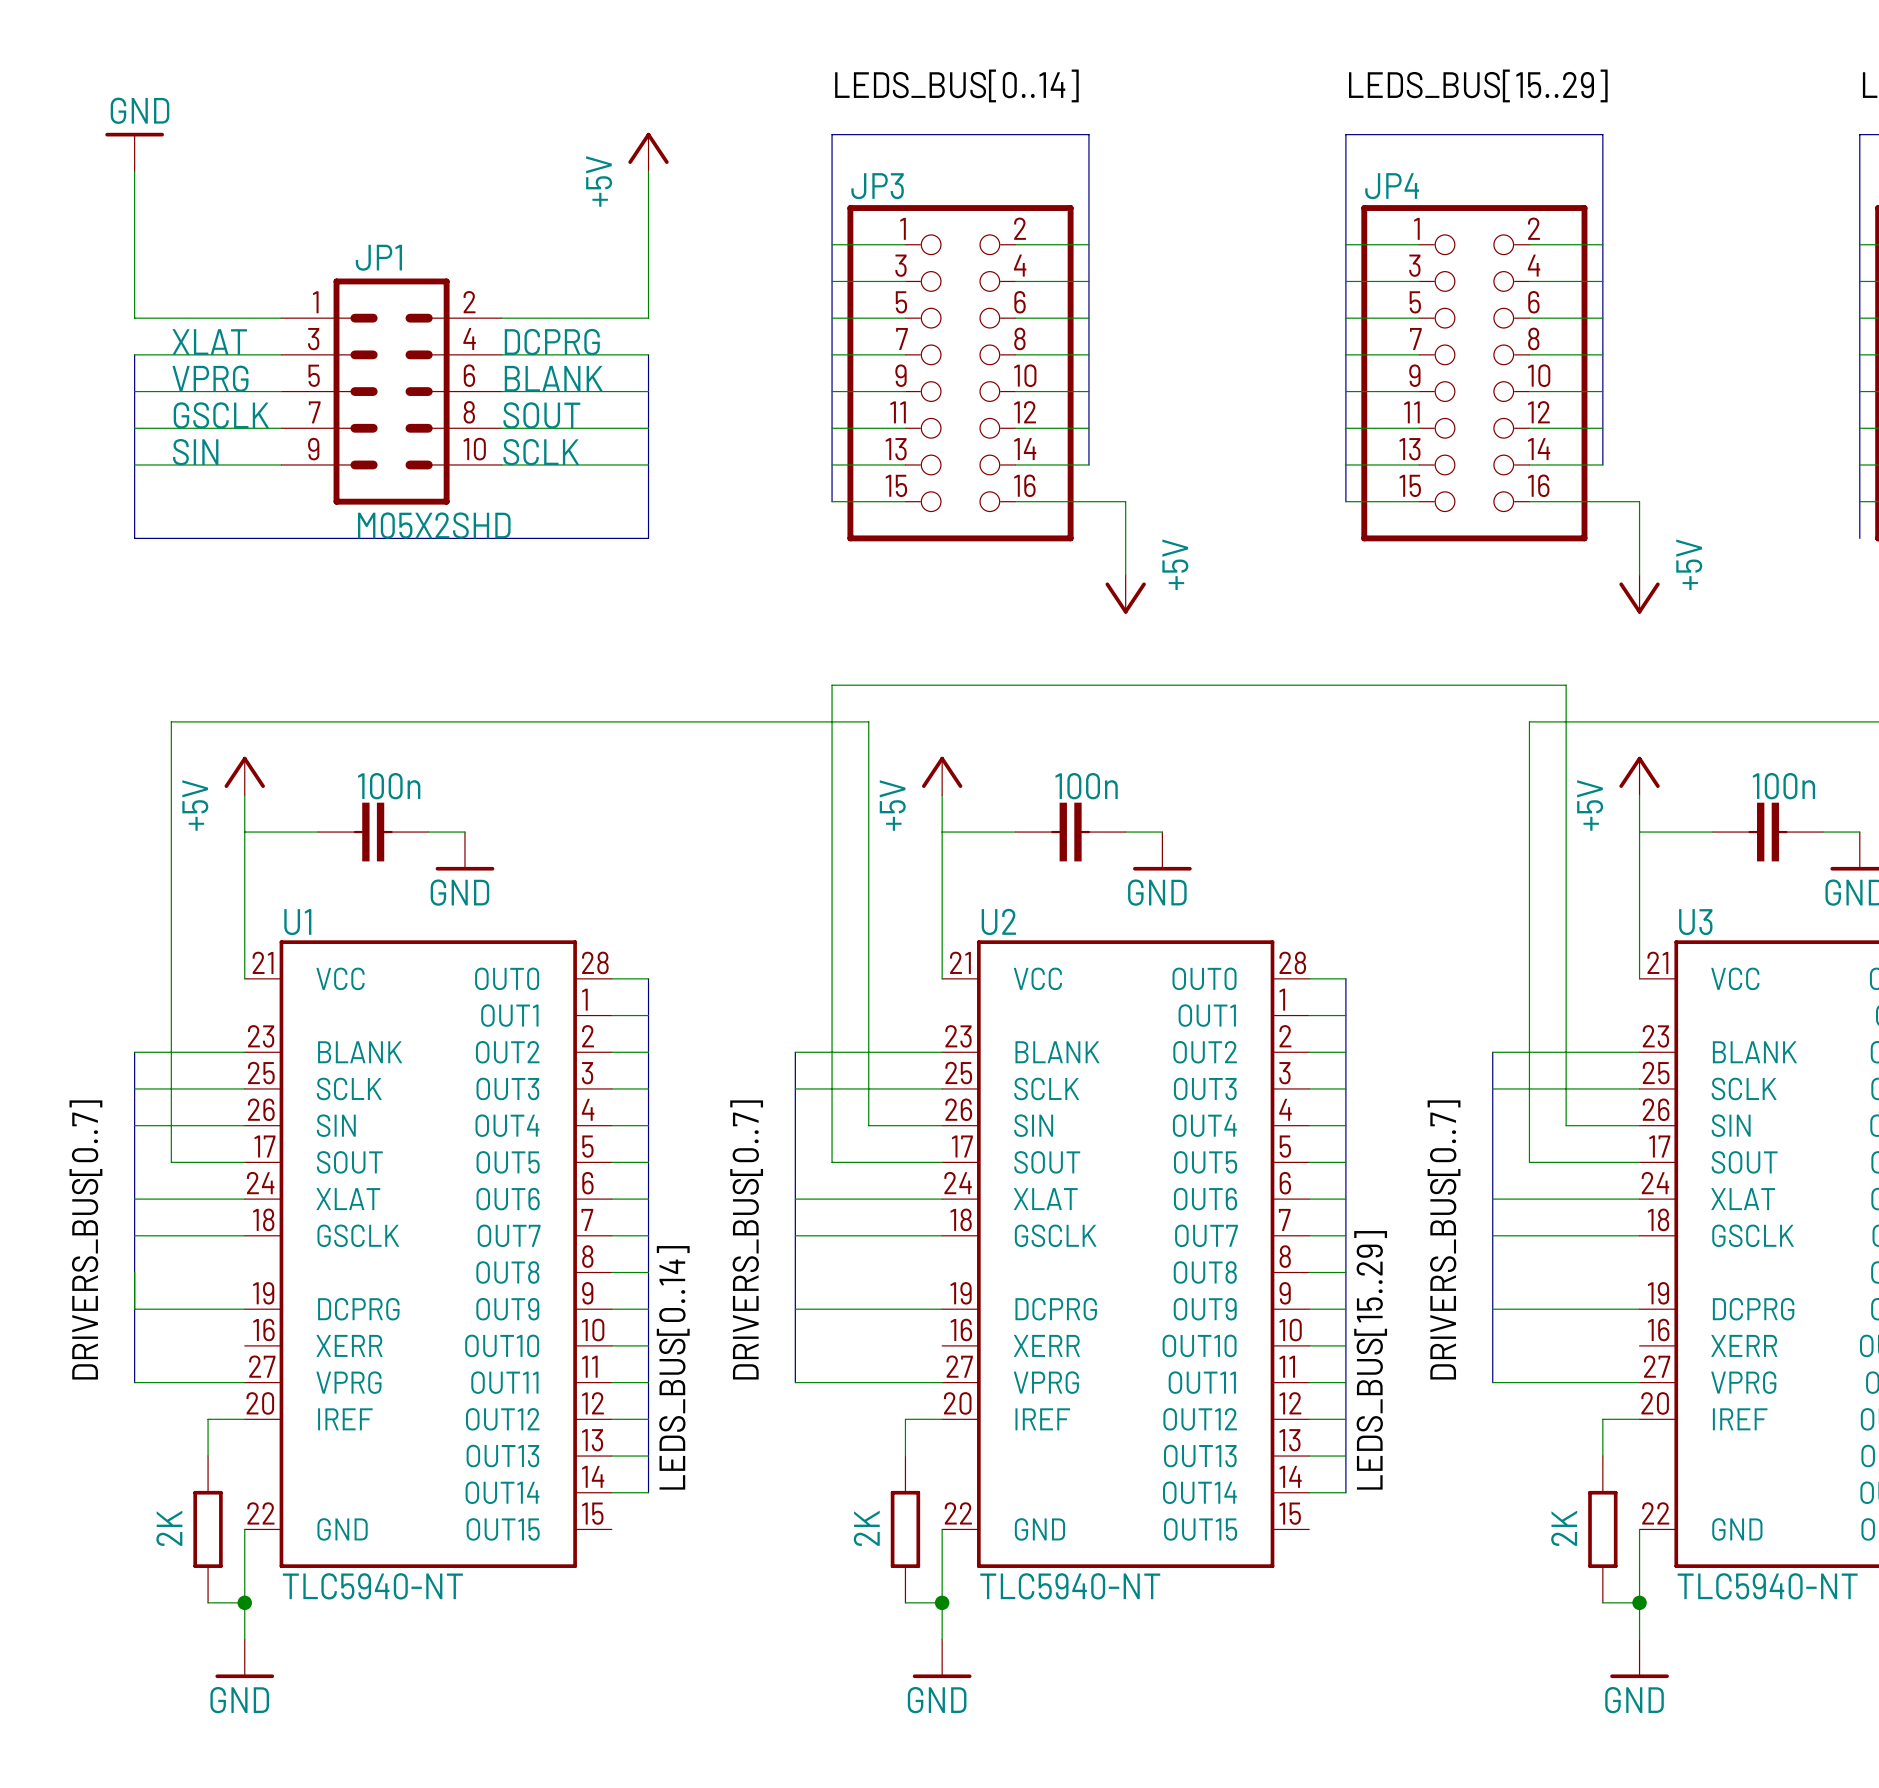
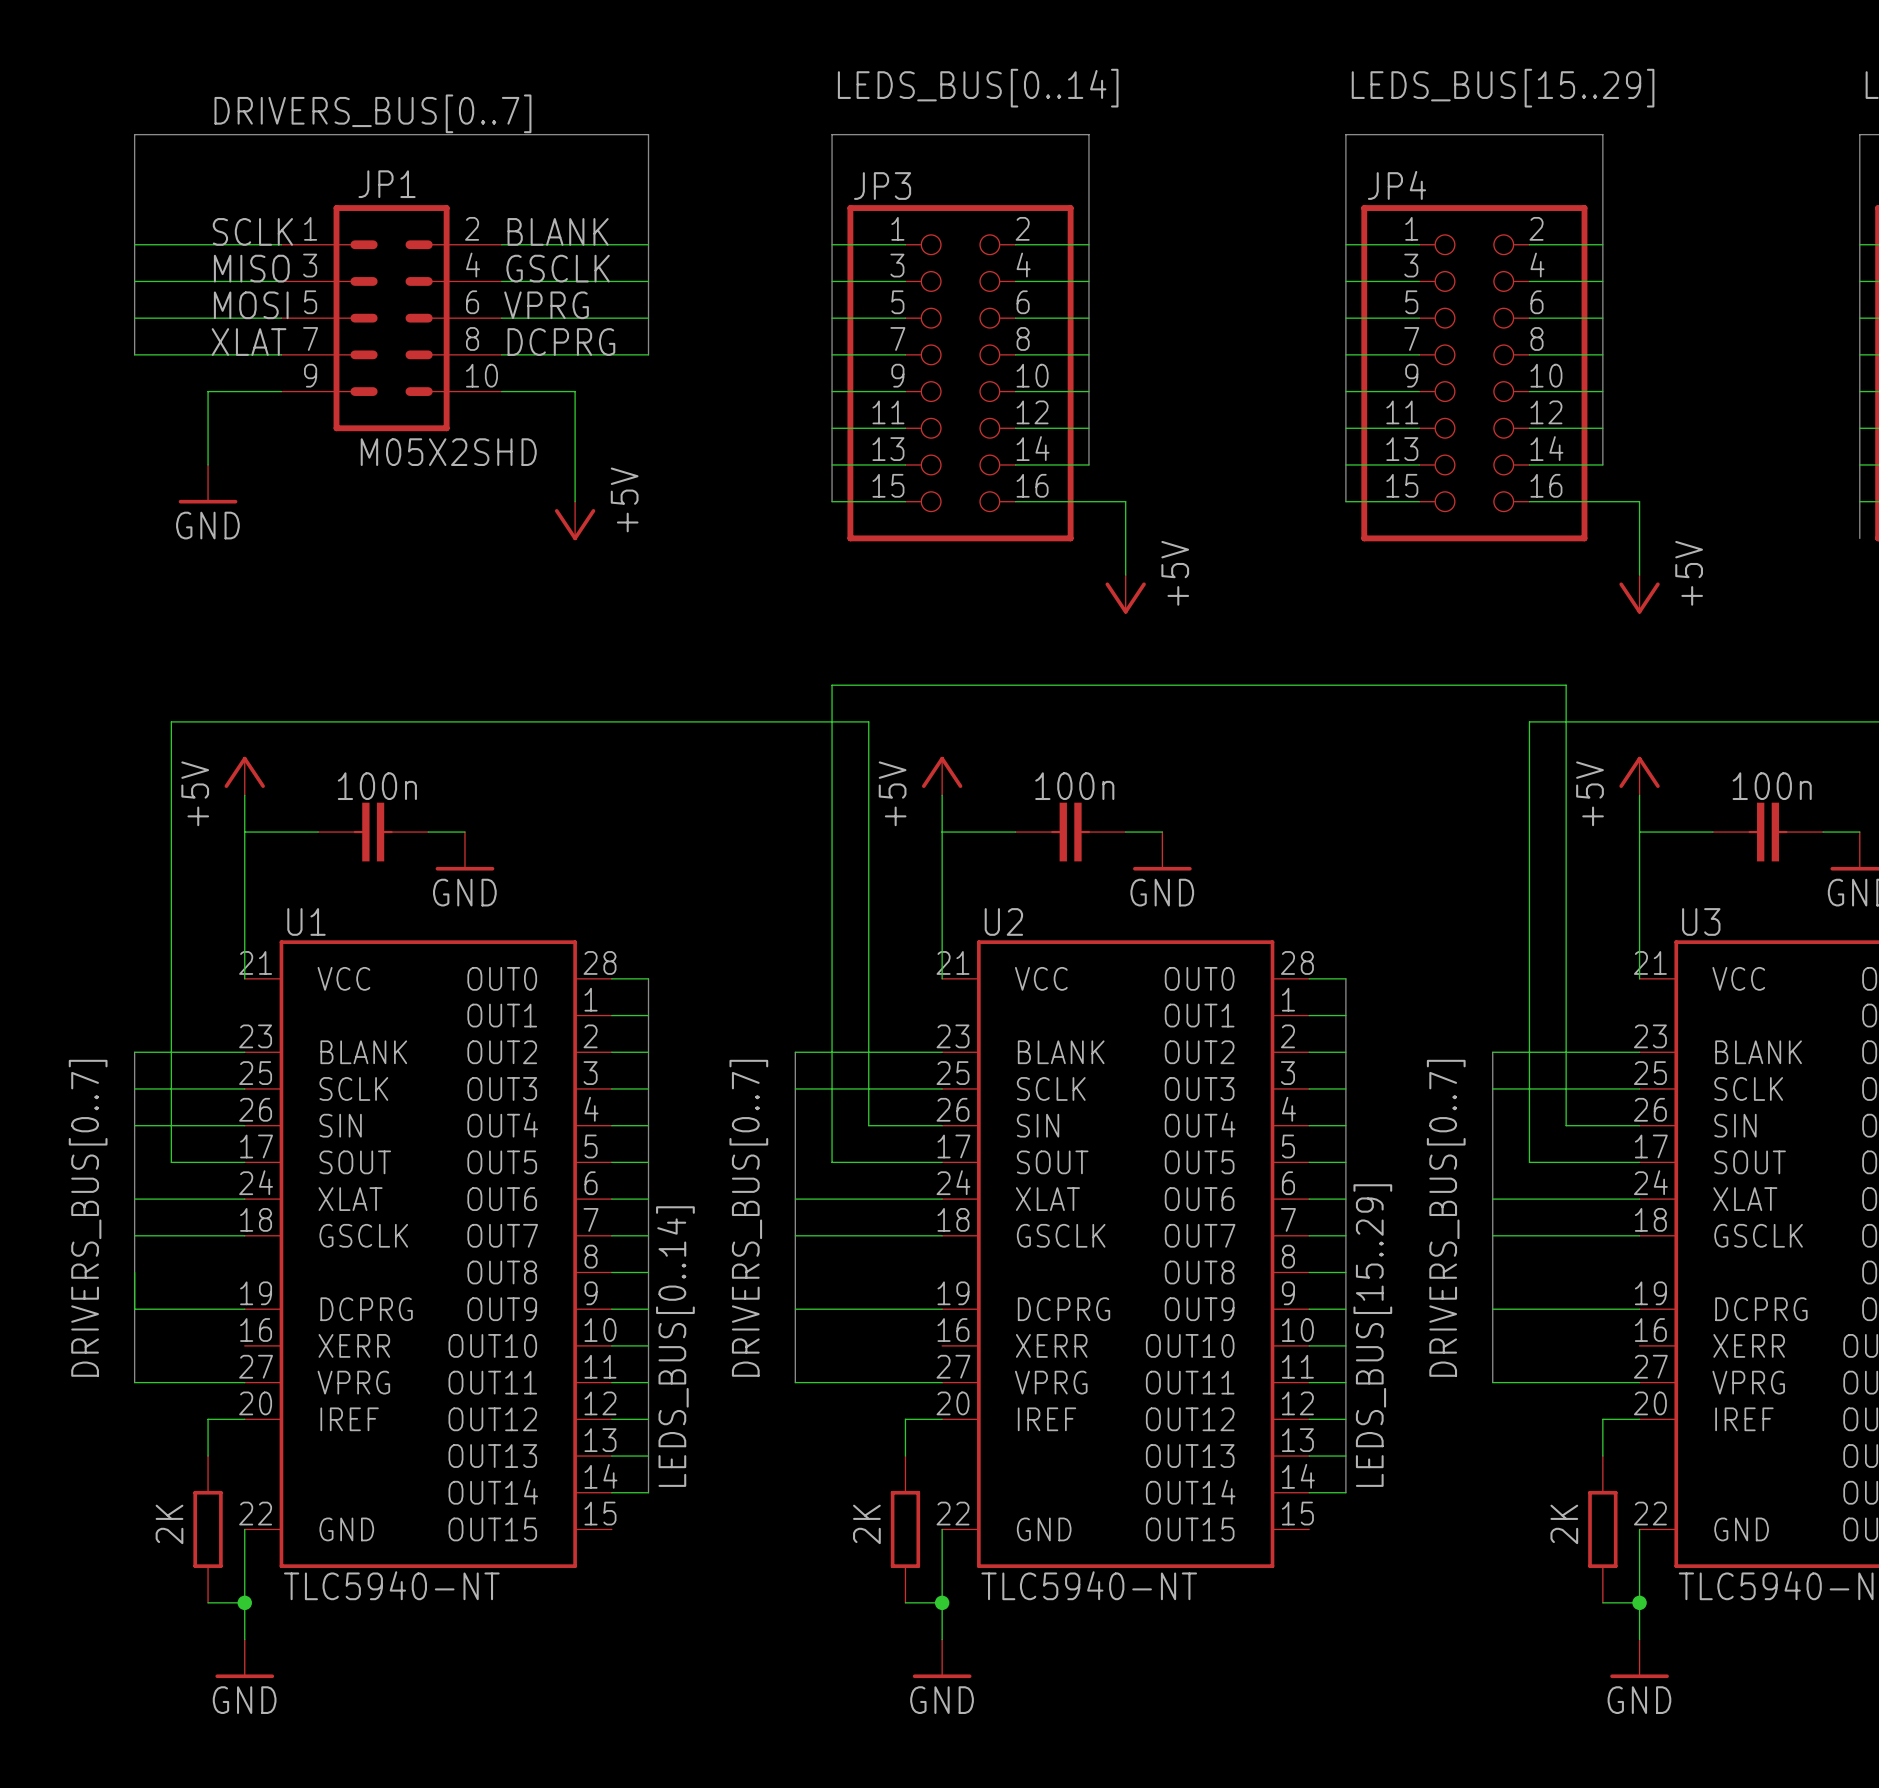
label: none -> DRIVERS_BUS[0..7] (372, 113)
power symbol rotation: 0° (134, 134) -> 180° (208, 501)
power symbol position: GND (134, 152) -> GND (208, 484)
power symbol: +5V (648, 152) -> none
text: none -> SCLK (252, 231)
text: none -> MISO (251, 268)
text: none -> GSCLK (558, 268)
text: none -> MOSI (251, 305)
text position: XLAT (209, 342) -> XLAT (249, 342)
bus: (134, 354) (134, 538) (648, 538) (648, 354) -> (134, 354) (134, 134) (648, 134) (648, 354)
text position: VPRG (210, 378) -> VPRG (546, 305)
text position: BLANK (553, 378) -> BLANK (558, 231)
wire: (134, 391) (208, 391) -> (208, 464) (208, 391)
JP1 position: (391, 391) -> (391, 318)
wire: (575, 391) (648, 391) -> (575, 391) (575, 501)
text: GSCLK (221, 415) -> none
text: SOUT (541, 415) -> none
wire: (134, 428) (281, 428) -> (134, 244) (281, 244)
wire: (501, 428) (648, 428) -> (501, 244) (648, 244)
text: SIN (195, 452) -> none
text: SCLK (541, 452) -> none
wire: (134, 464) (281, 464) -> (134, 281) (281, 281)
wire: (501, 464) (648, 464) -> (501, 281) (648, 281)
power symbol: none -> +5V (575, 520)

